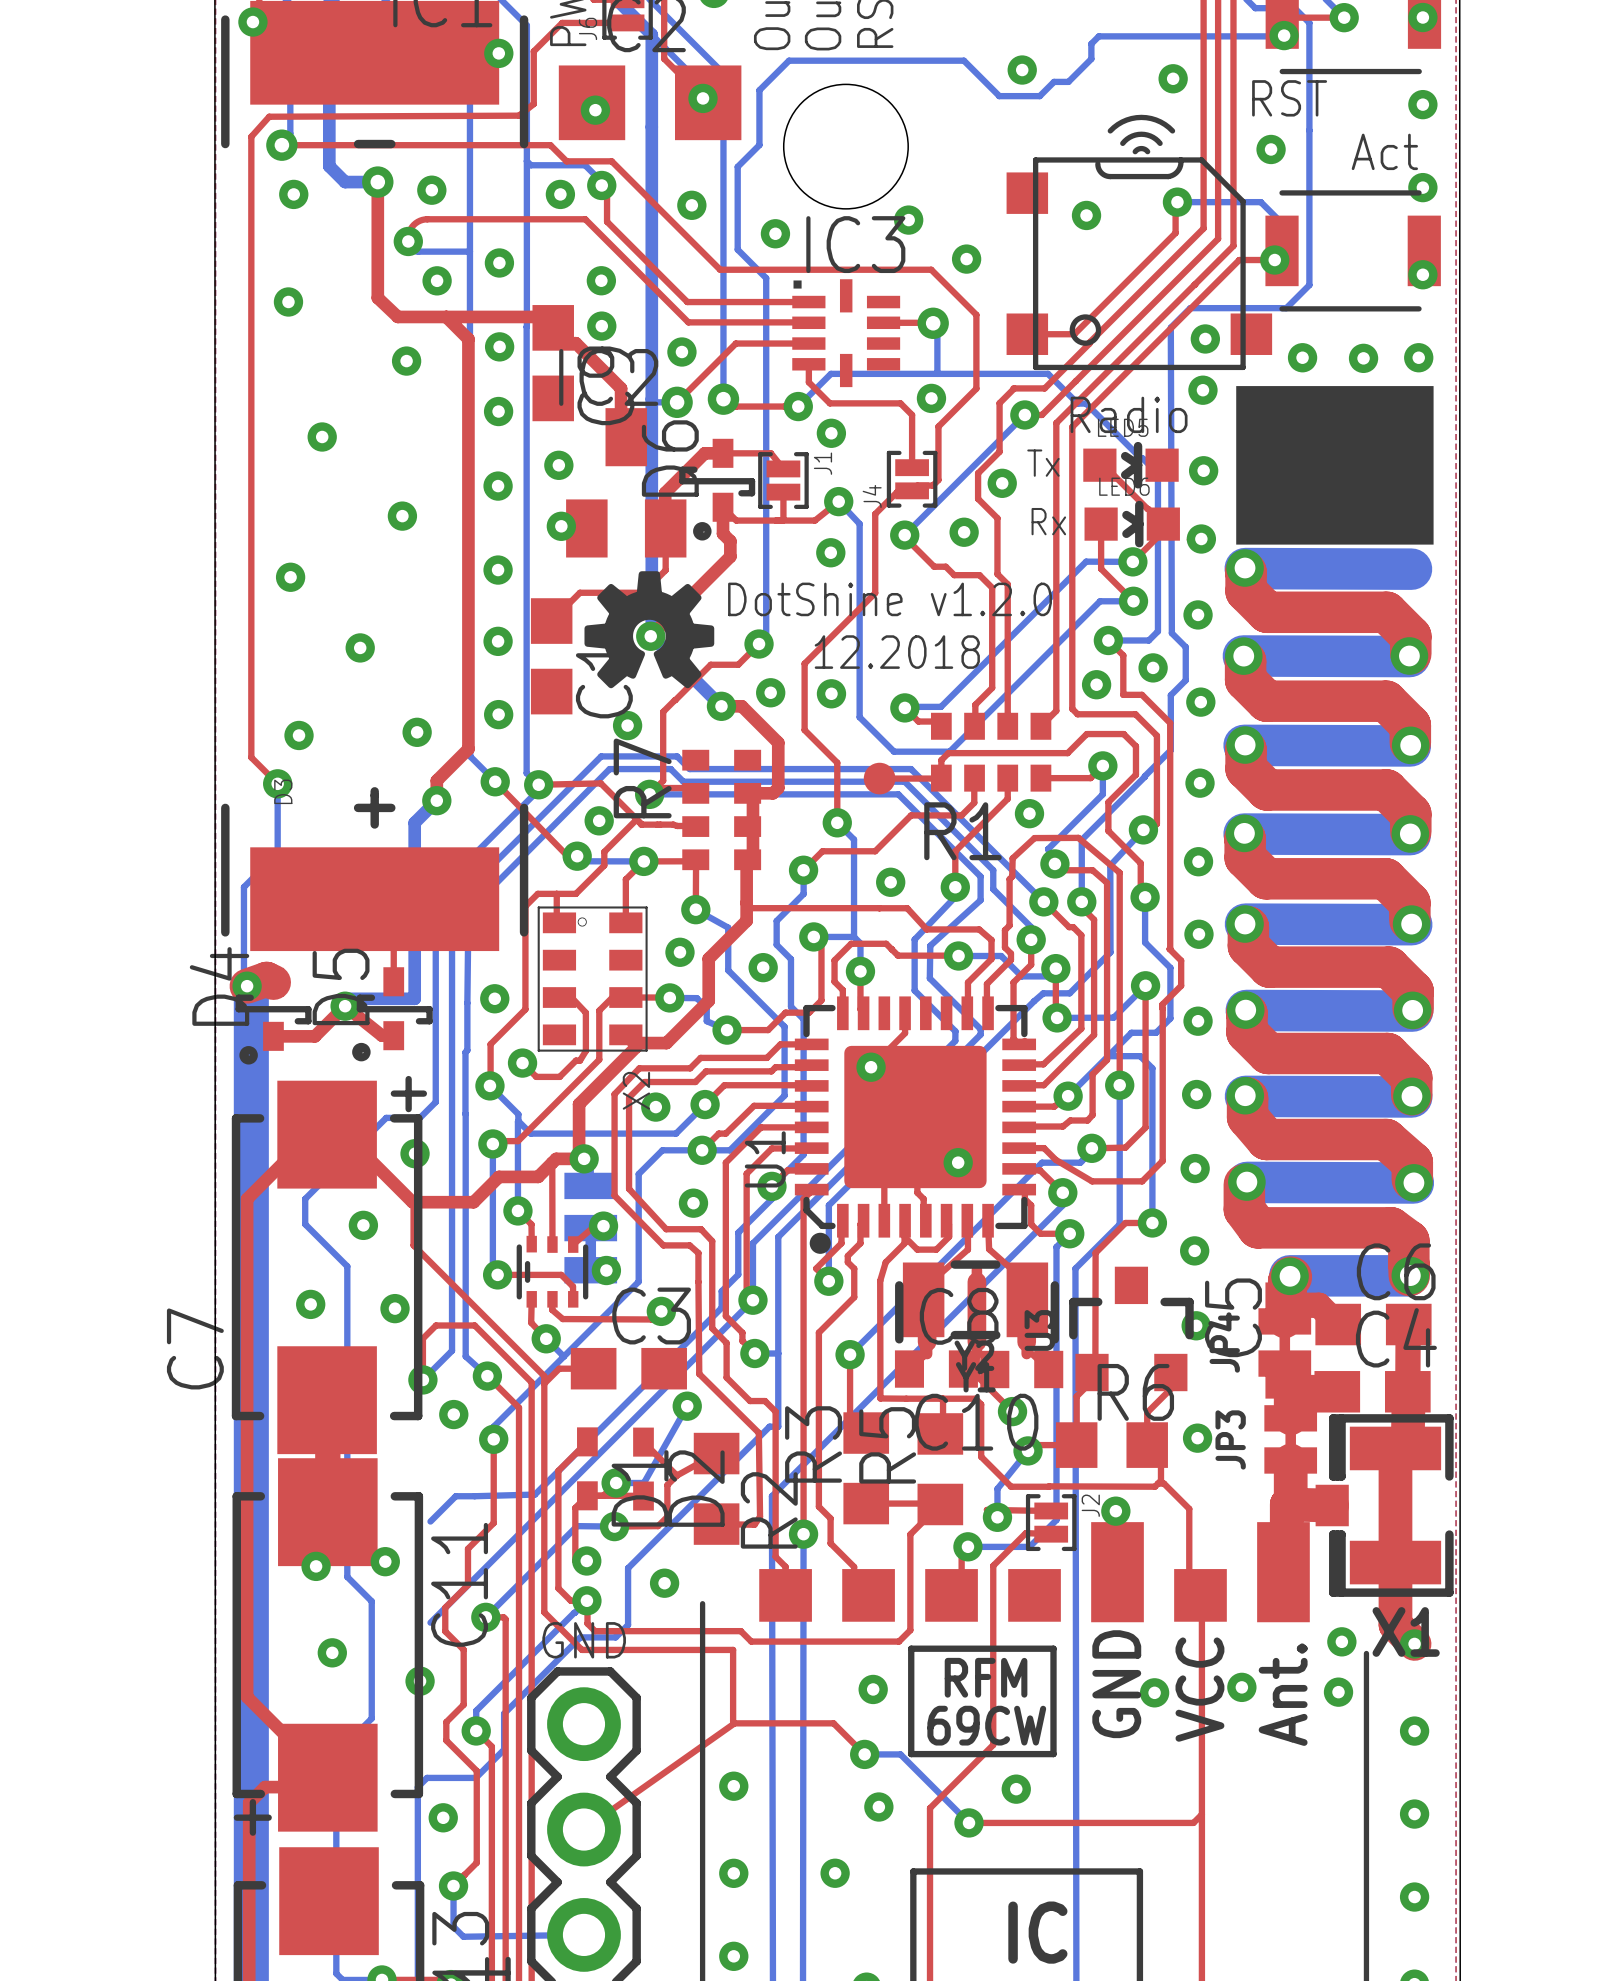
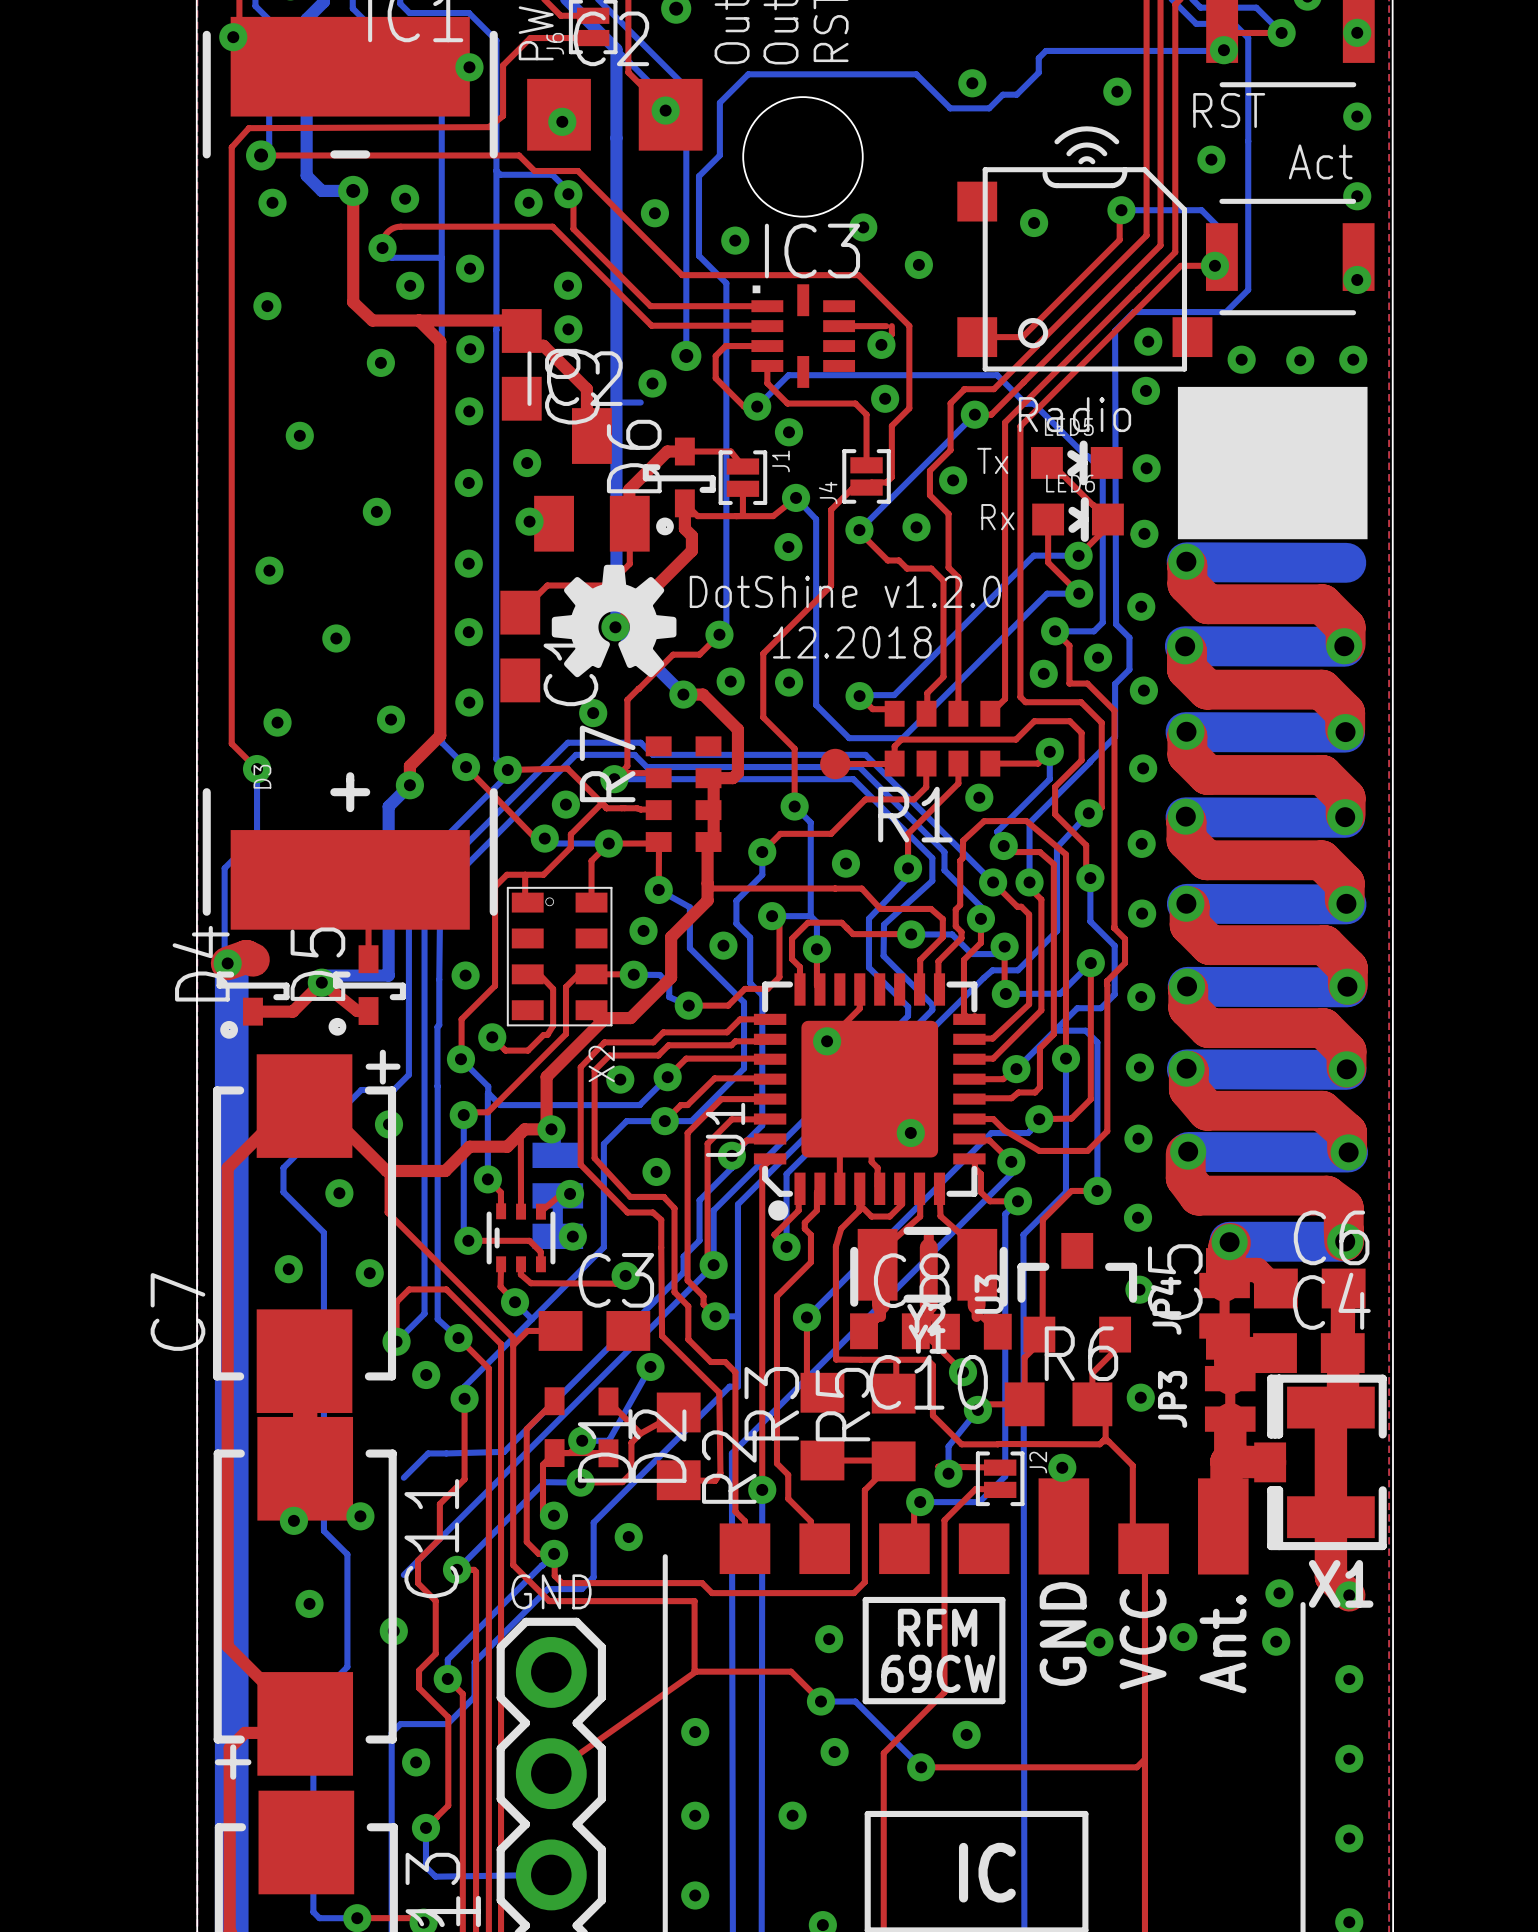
bottom track: (724, 111) (723, 399) -> (686, 122) (686, 355)
top track: (903, 269) (931, 269) (976, 314) (976, 388) (956, 408) -> (858, 275) (909, 325) (909, 408)
top track: none -> (891, 326) (891, 334) (881, 344)
bottom track: (933, 323) (937, 327) (937, 373) -> none
via position: (933, 323) -> (881, 344)
top track: (765, 343) (735, 343) (677, 402) -> none
via position: (681, 351) -> (652, 383)
via: none -> (686, 355)
top track: (723, 399) (736, 406) (784, 406) -> (725, 346) (715, 355) (715, 378) (744, 406)
via: (723, 399) -> none
via: (677, 402) -> none

